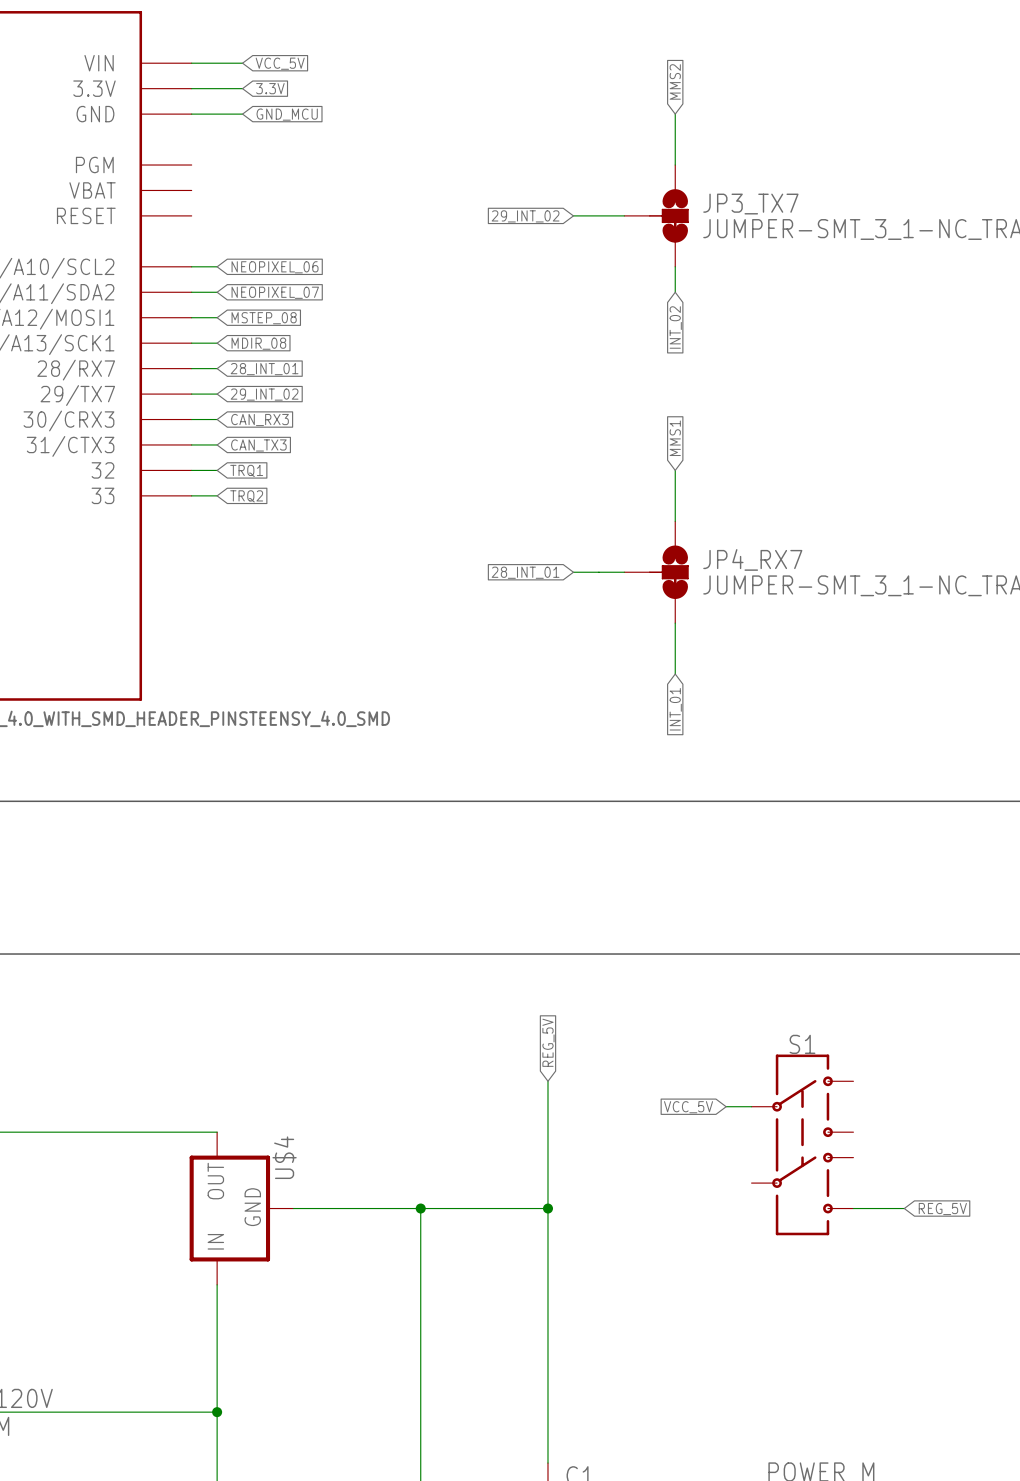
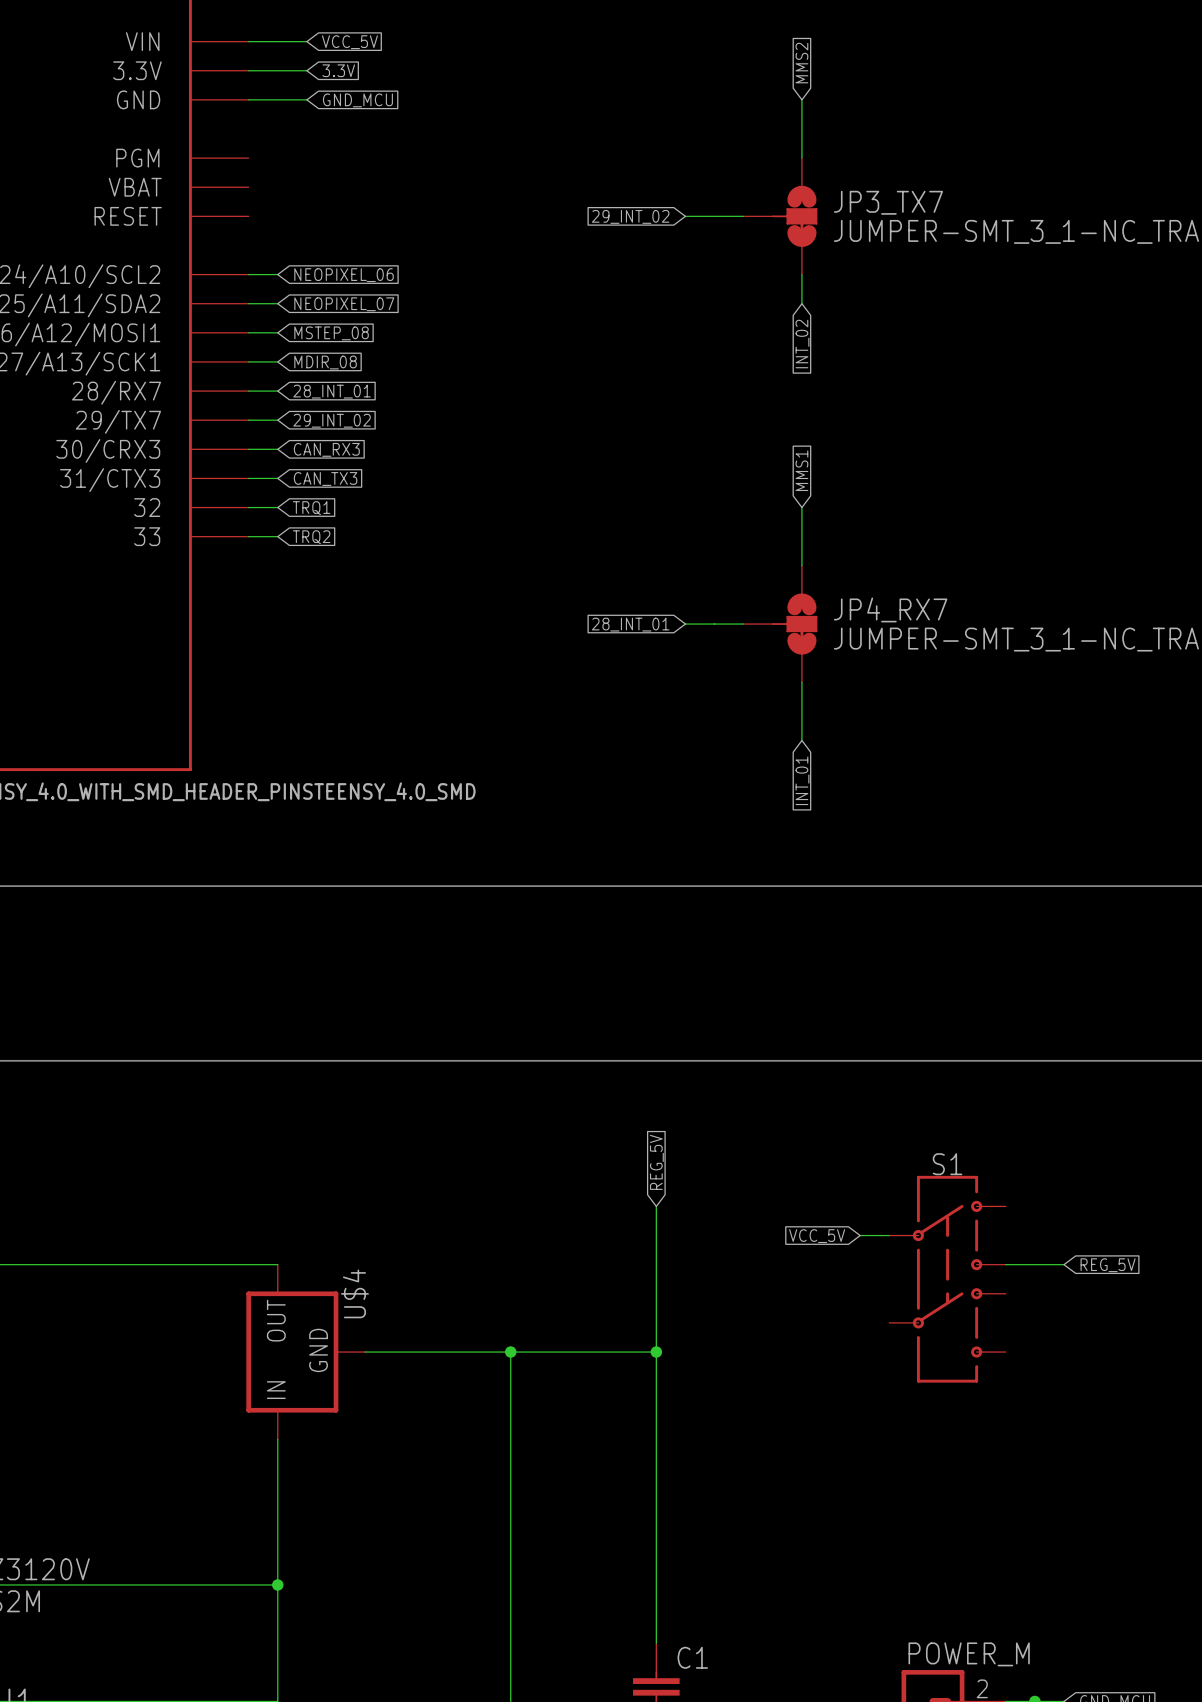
wire: (853, 1208) (904, 1208) -> (1005, 1264) (1064, 1264)
global label position: REG_5V (942, 1209) -> REG_5V (1108, 1265)

